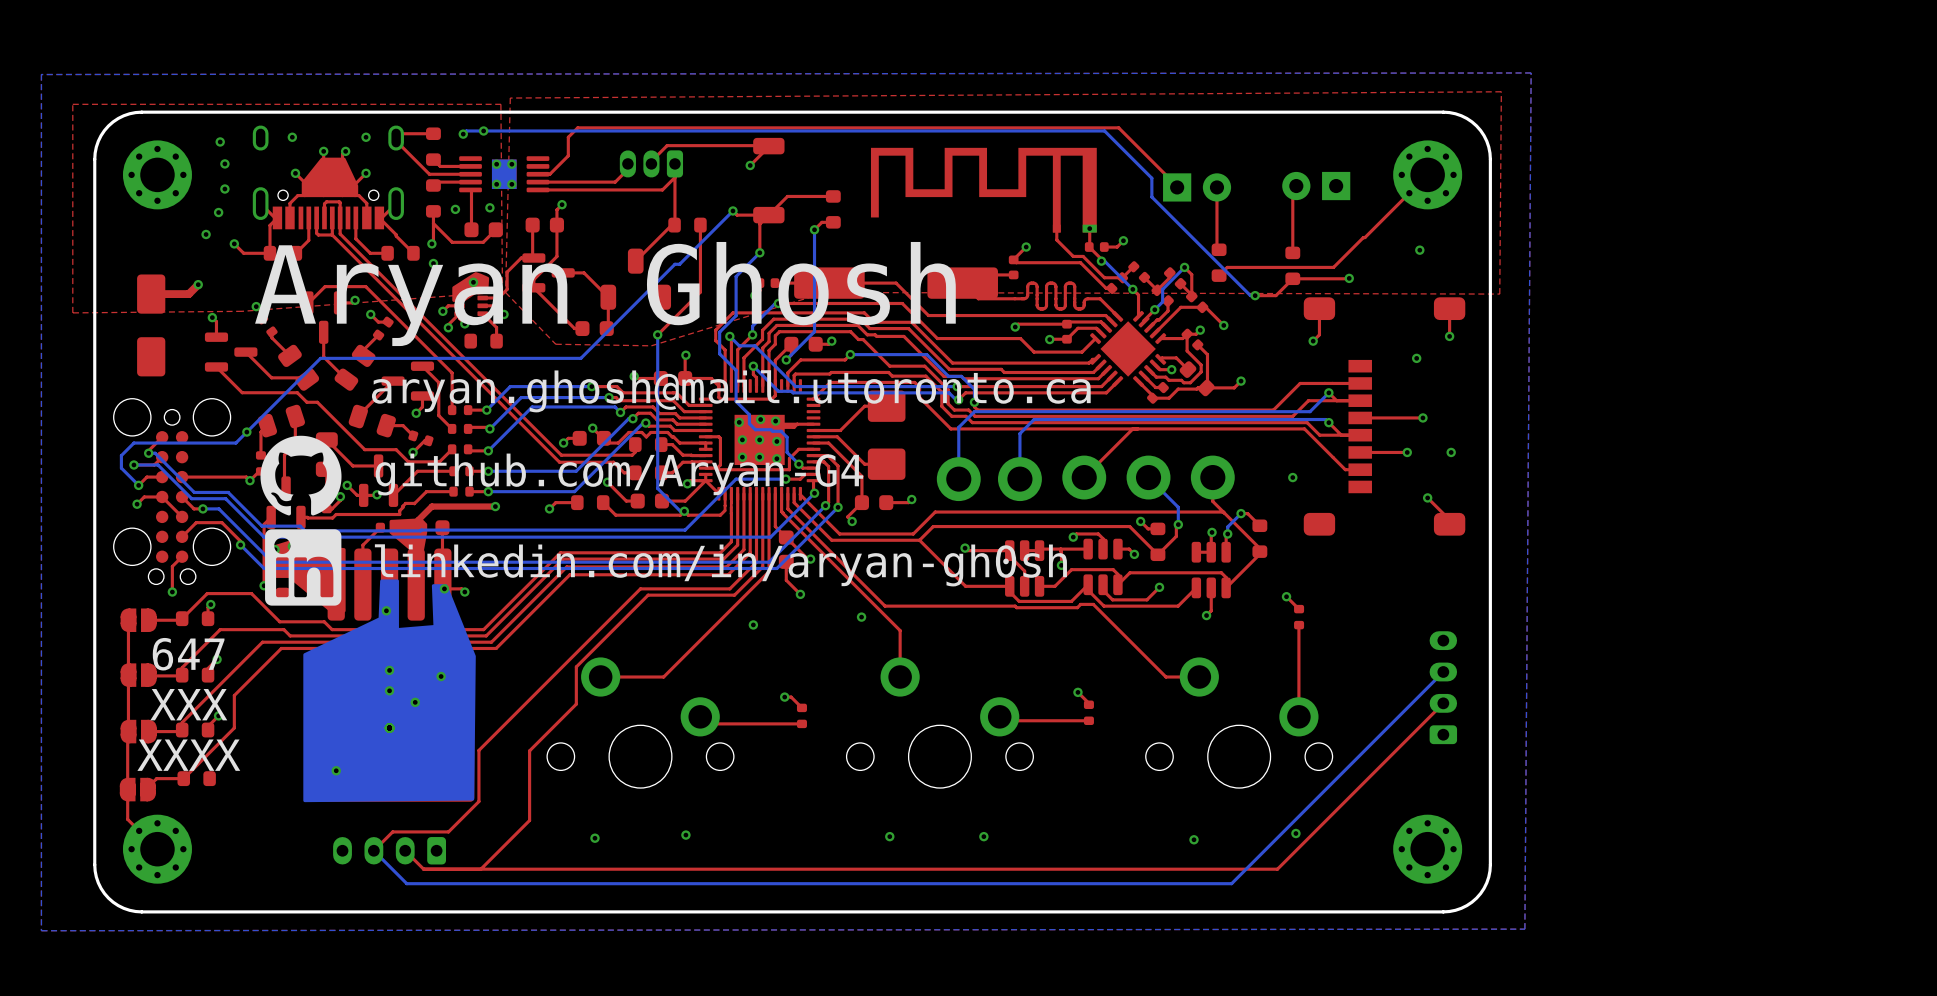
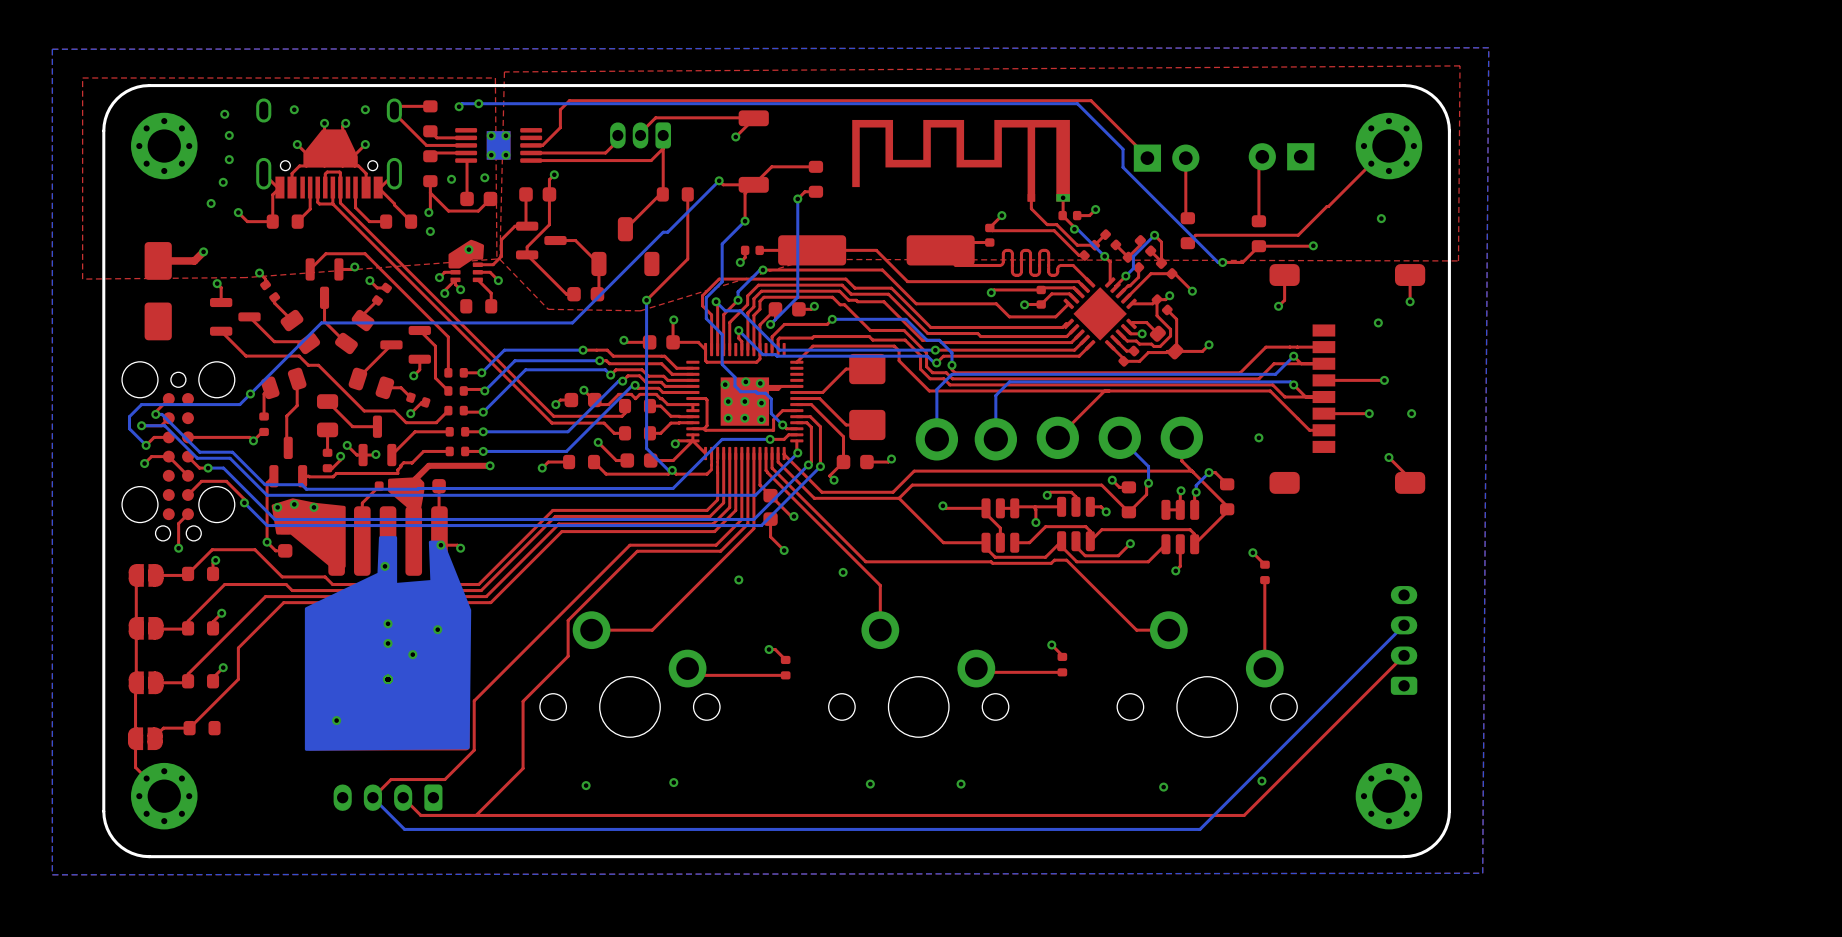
text: Aryan Ghosh (605, 294) -> none
text: aryan.ghosh@mail.utoronto.ca (731, 391) -> none
drawing: [260, 435, 342, 606] -> none
text: github.com/Aryan-G4 (619, 474) -> none
text: linkedin.com/in/aryan-gh0sh (720, 565) -> none
text: 647 (188, 654) -> none
text: XXX (188, 704) -> none
text: XXXX (188, 755) -> none

